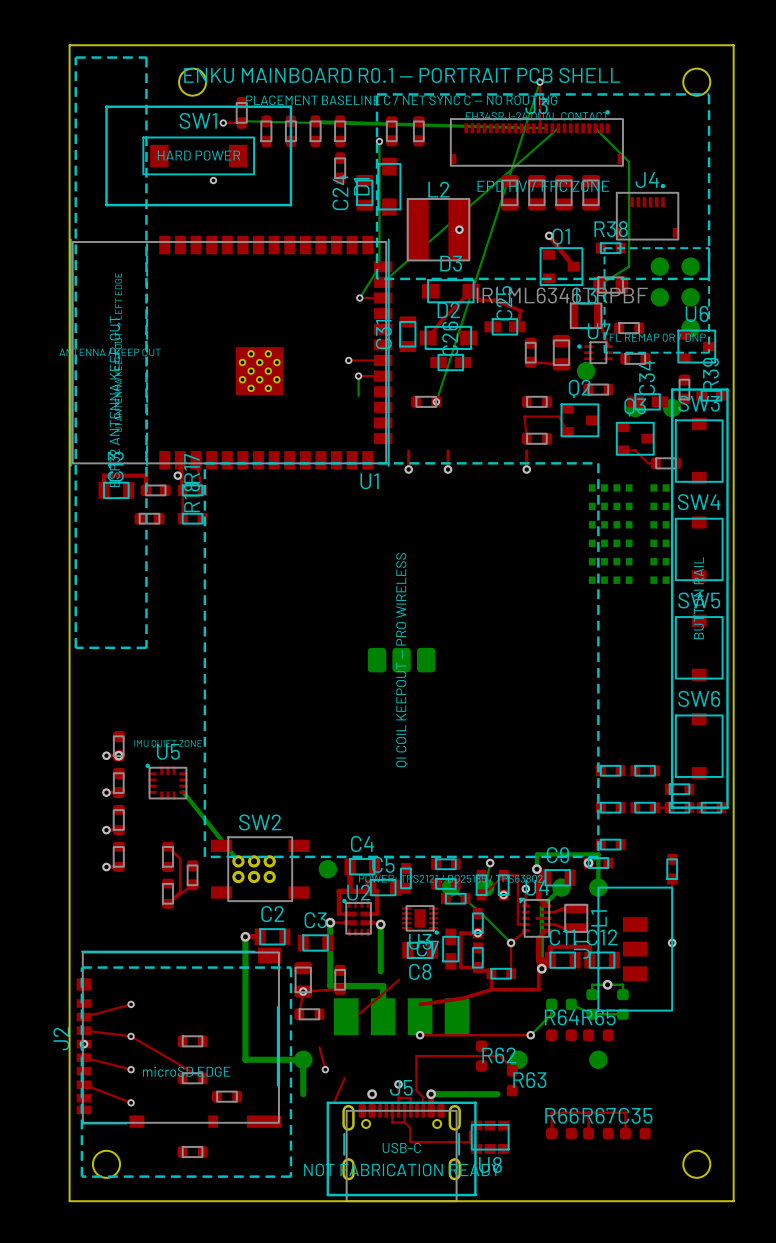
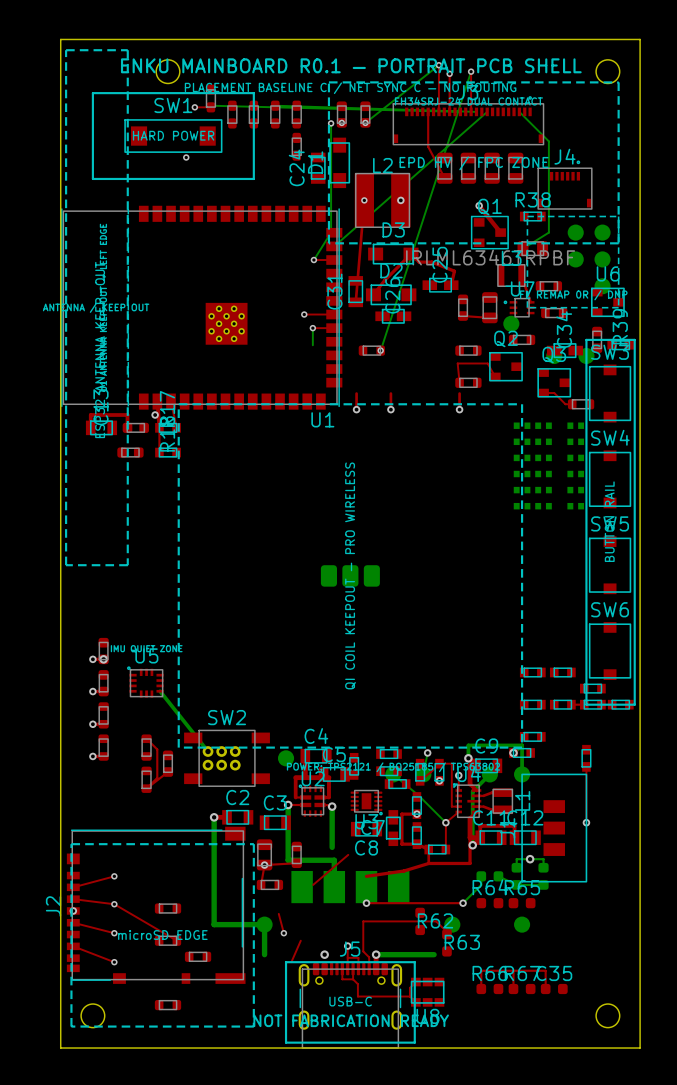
top track: none -> (438, 65) (438, 111)
bottom track: none -> (438, 65) (365, 122)
via: none -> (438, 65)
top track: none -> (449, 73) (449, 111)
via: none -> (449, 73)
top track: none -> (428, 111) (428, 146) (444, 178)
via: none -> (341, 122)
via: none -> (365, 122)
top track: none -> (364, 200) (355, 302)
via: none -> (364, 200)

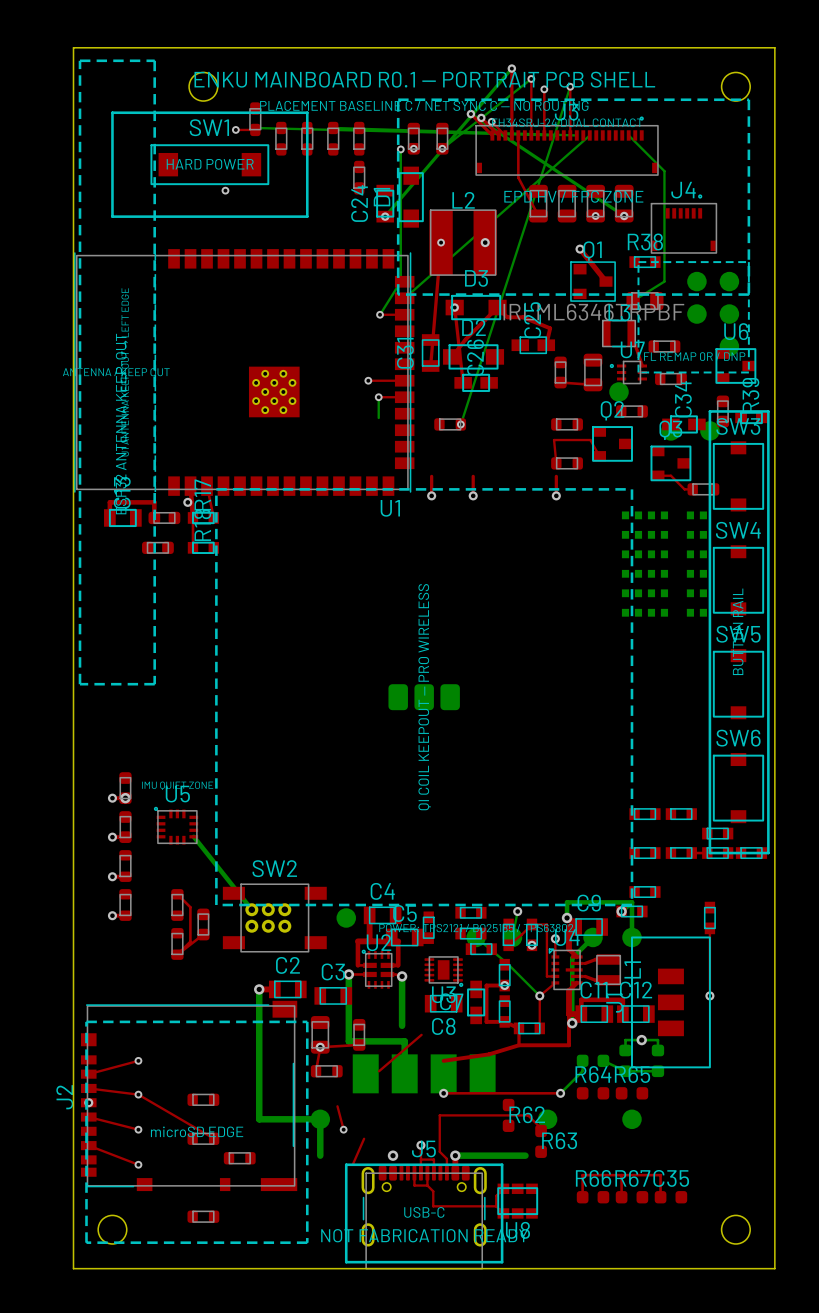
top track: none -> (511, 68) (511, 135)
bottom track: none -> (511, 68) (385, 216)
via: none -> (511, 68)
top track: none -> (470, 114) (492, 135)
bottom track: none -> (470, 114) (624, 215)
via: none -> (470, 114)
top track: none -> (481, 117) (498, 135)
via: none -> (481, 117)
top track: none -> (491, 121) (505, 135)
via: none -> (491, 121)
via: none -> (385, 216)
via: none -> (595, 215)
via: none -> (624, 215)
top track: none -> (454, 307) (463, 382)
via: none -> (454, 307)

